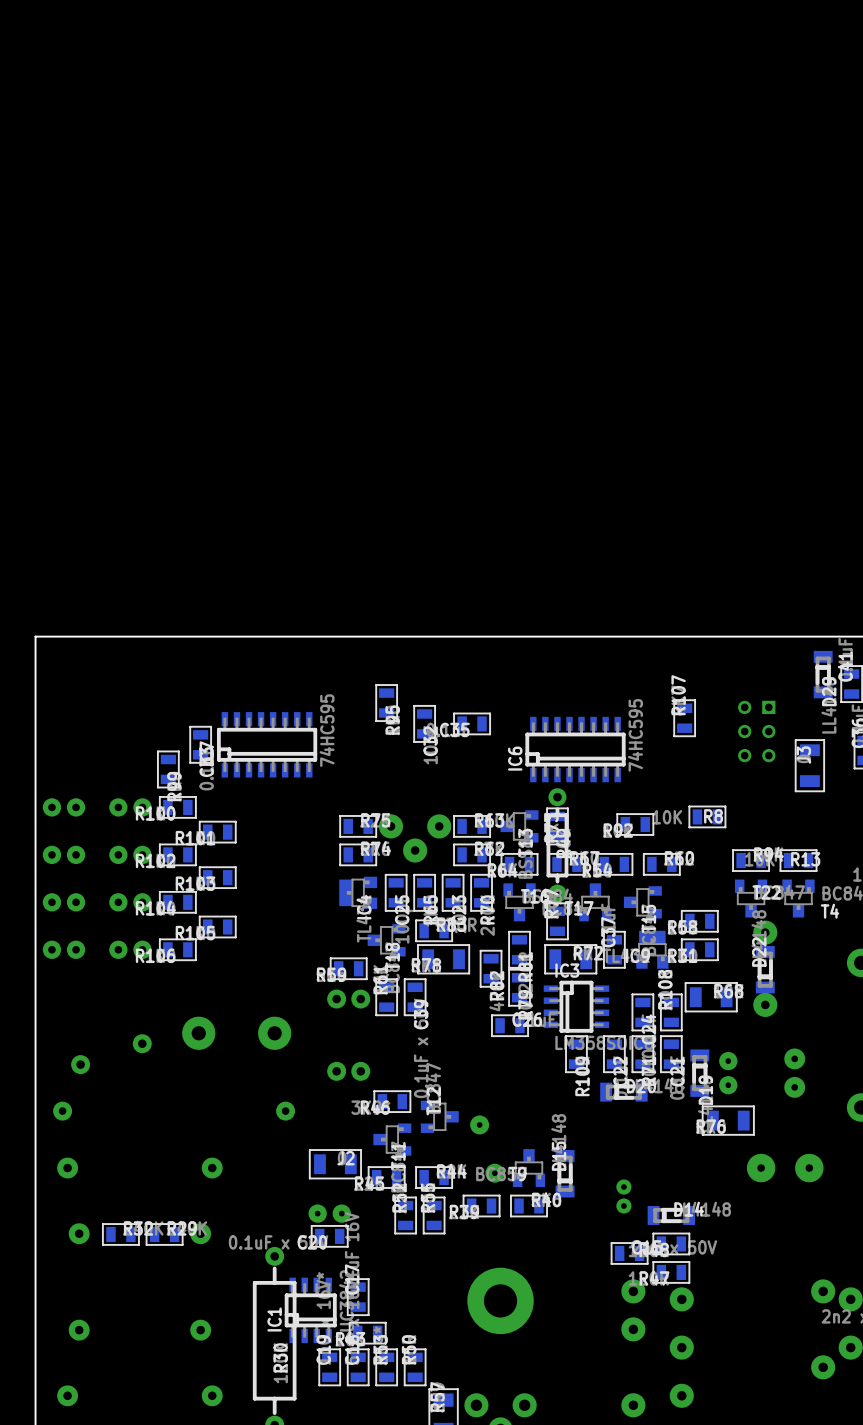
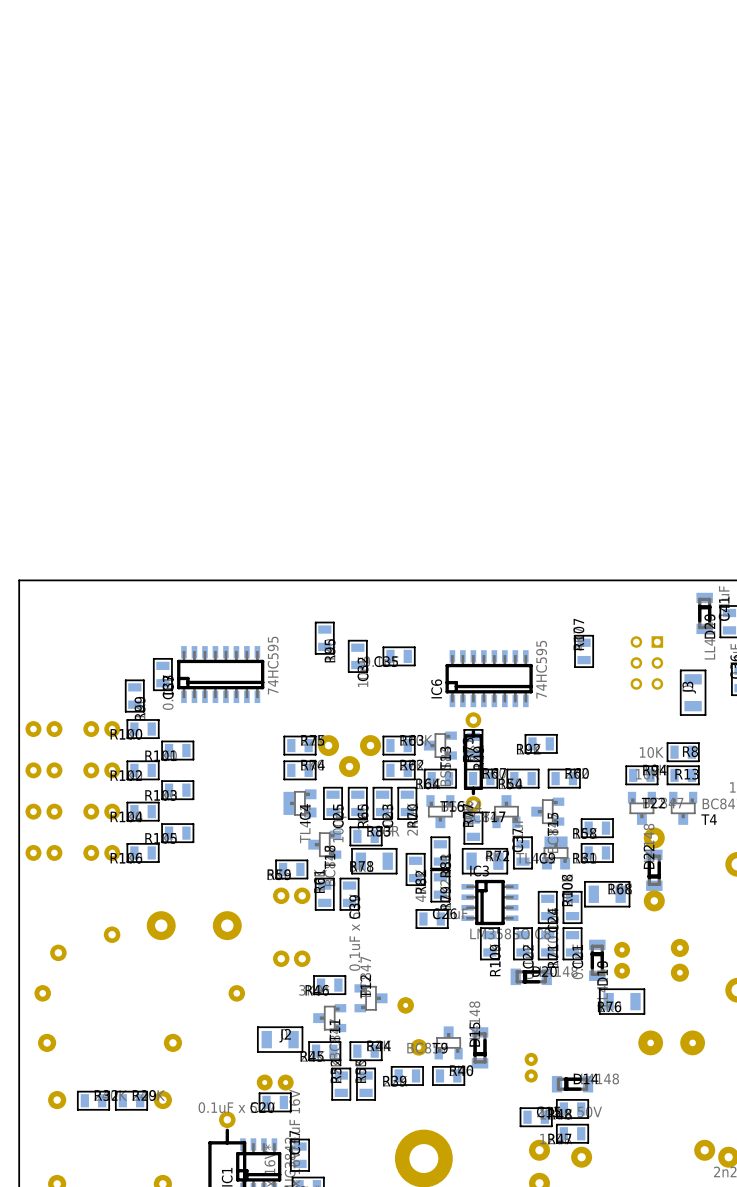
R8 position: (707, 816) -> (683, 752)

